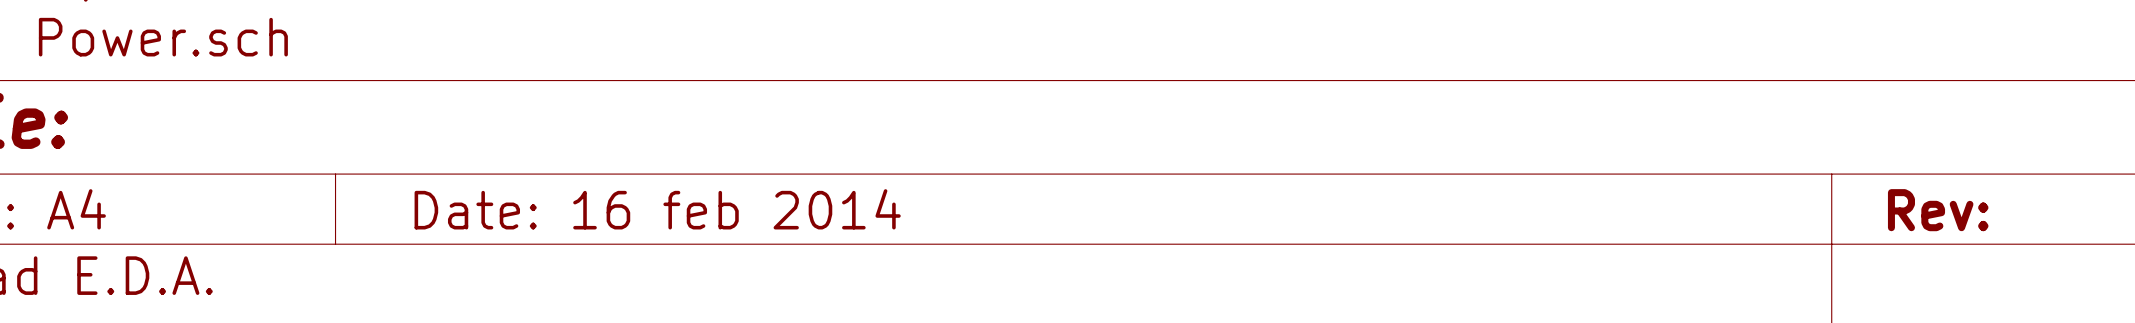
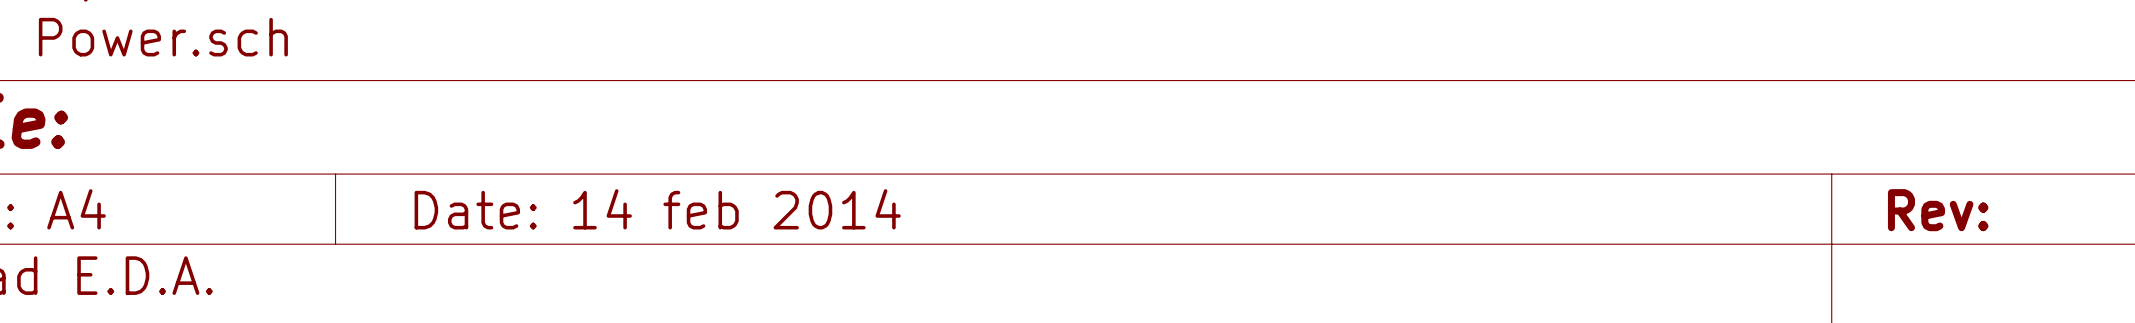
title block: Date: 16 feb 2014 (657, 209) -> Date: 14 feb 2014 (657, 209)

